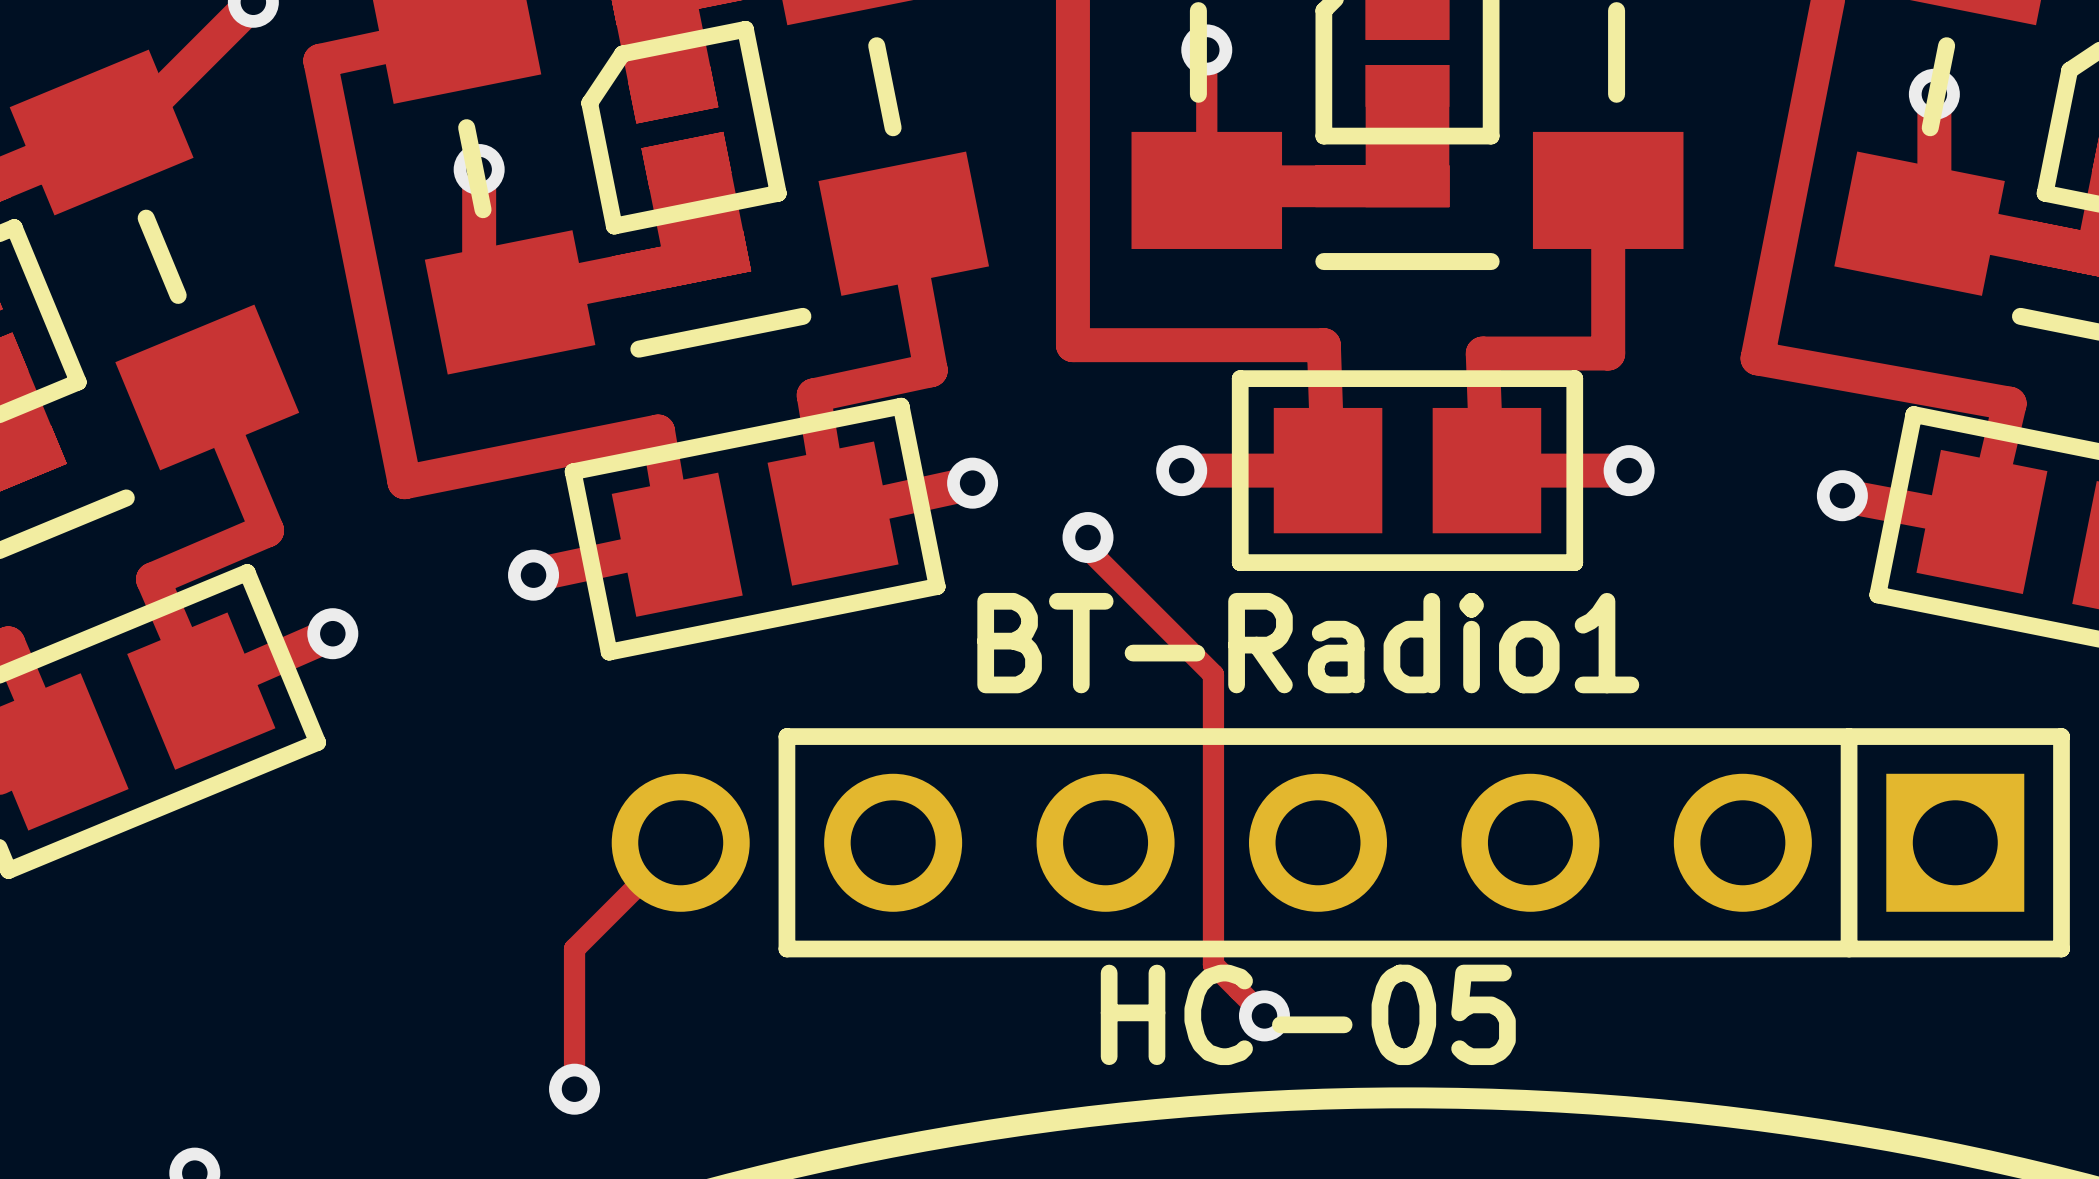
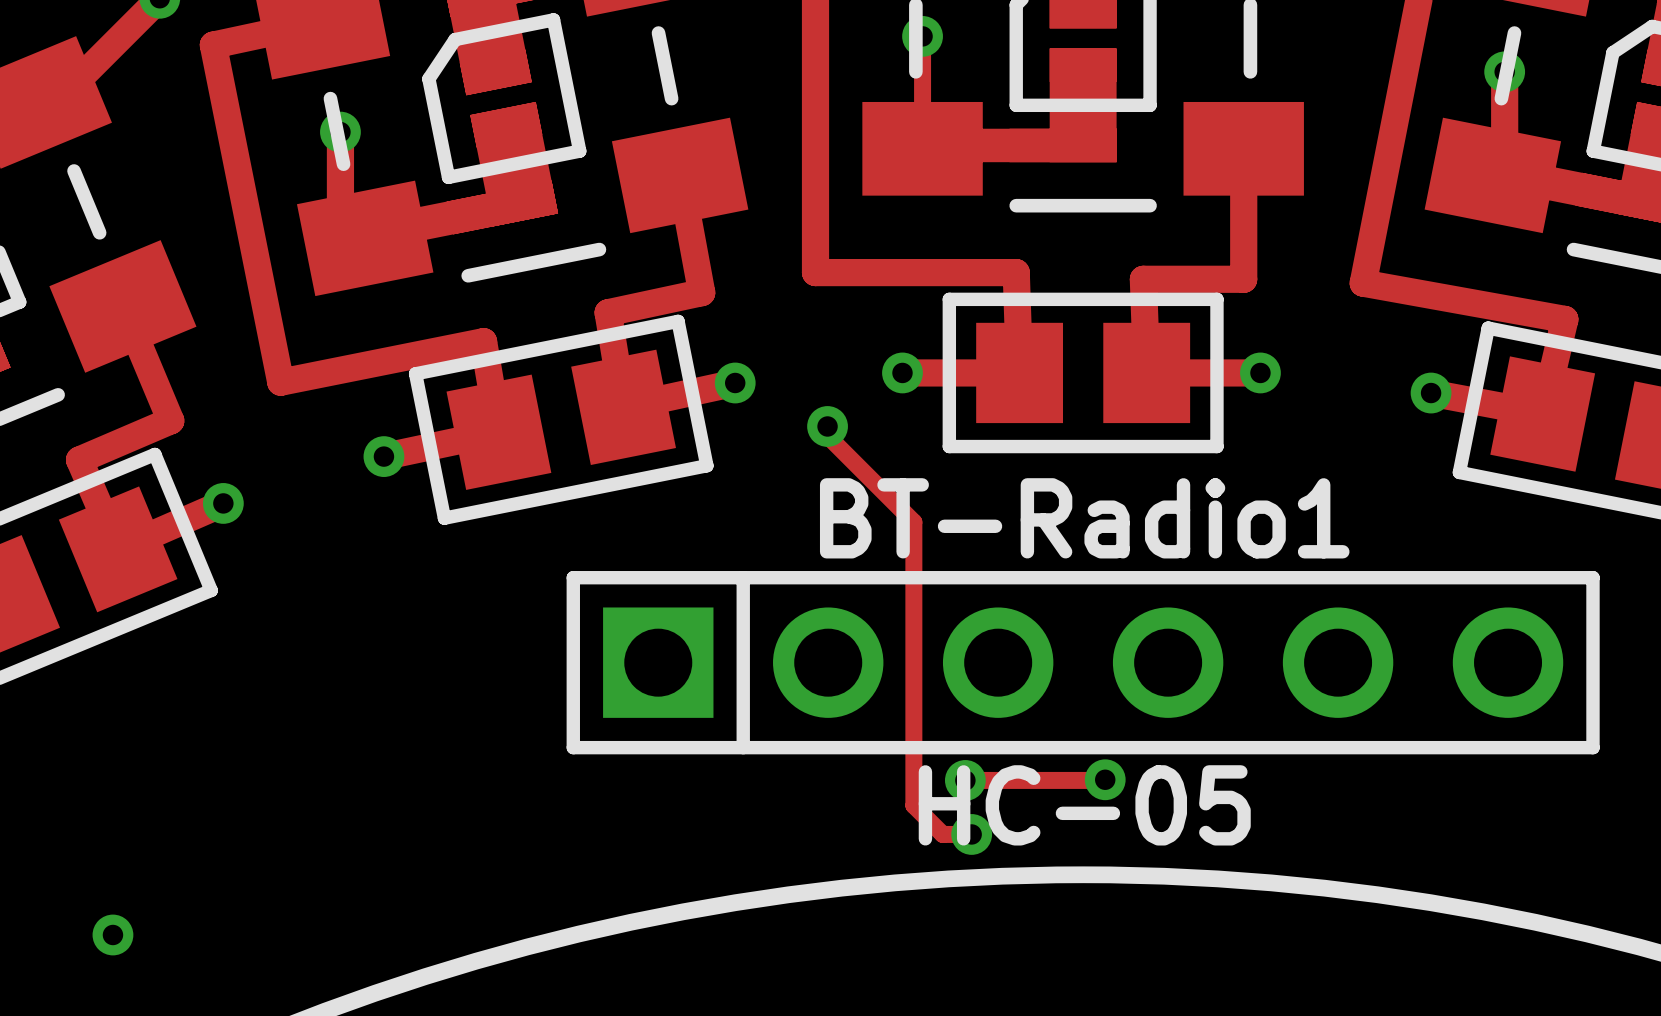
track: (1195, 657) (1213, 674) (1213, 964) (1264, 1015) -> (913, 522) (913, 805) (942, 834) (971, 834)
BT-Radio1 footprint: [611, 728, 2070, 958] -> [566, 571, 1600, 755]
track: (680, 842) (574, 948) (574, 1089) -> none
track: none -> (965, 780) (1104, 780)
via: none -> (965, 780)
via: none -> (1105, 779)
via: (1264, 1015) -> none
via: none -> (971, 834)
via: (574, 1089) -> none

